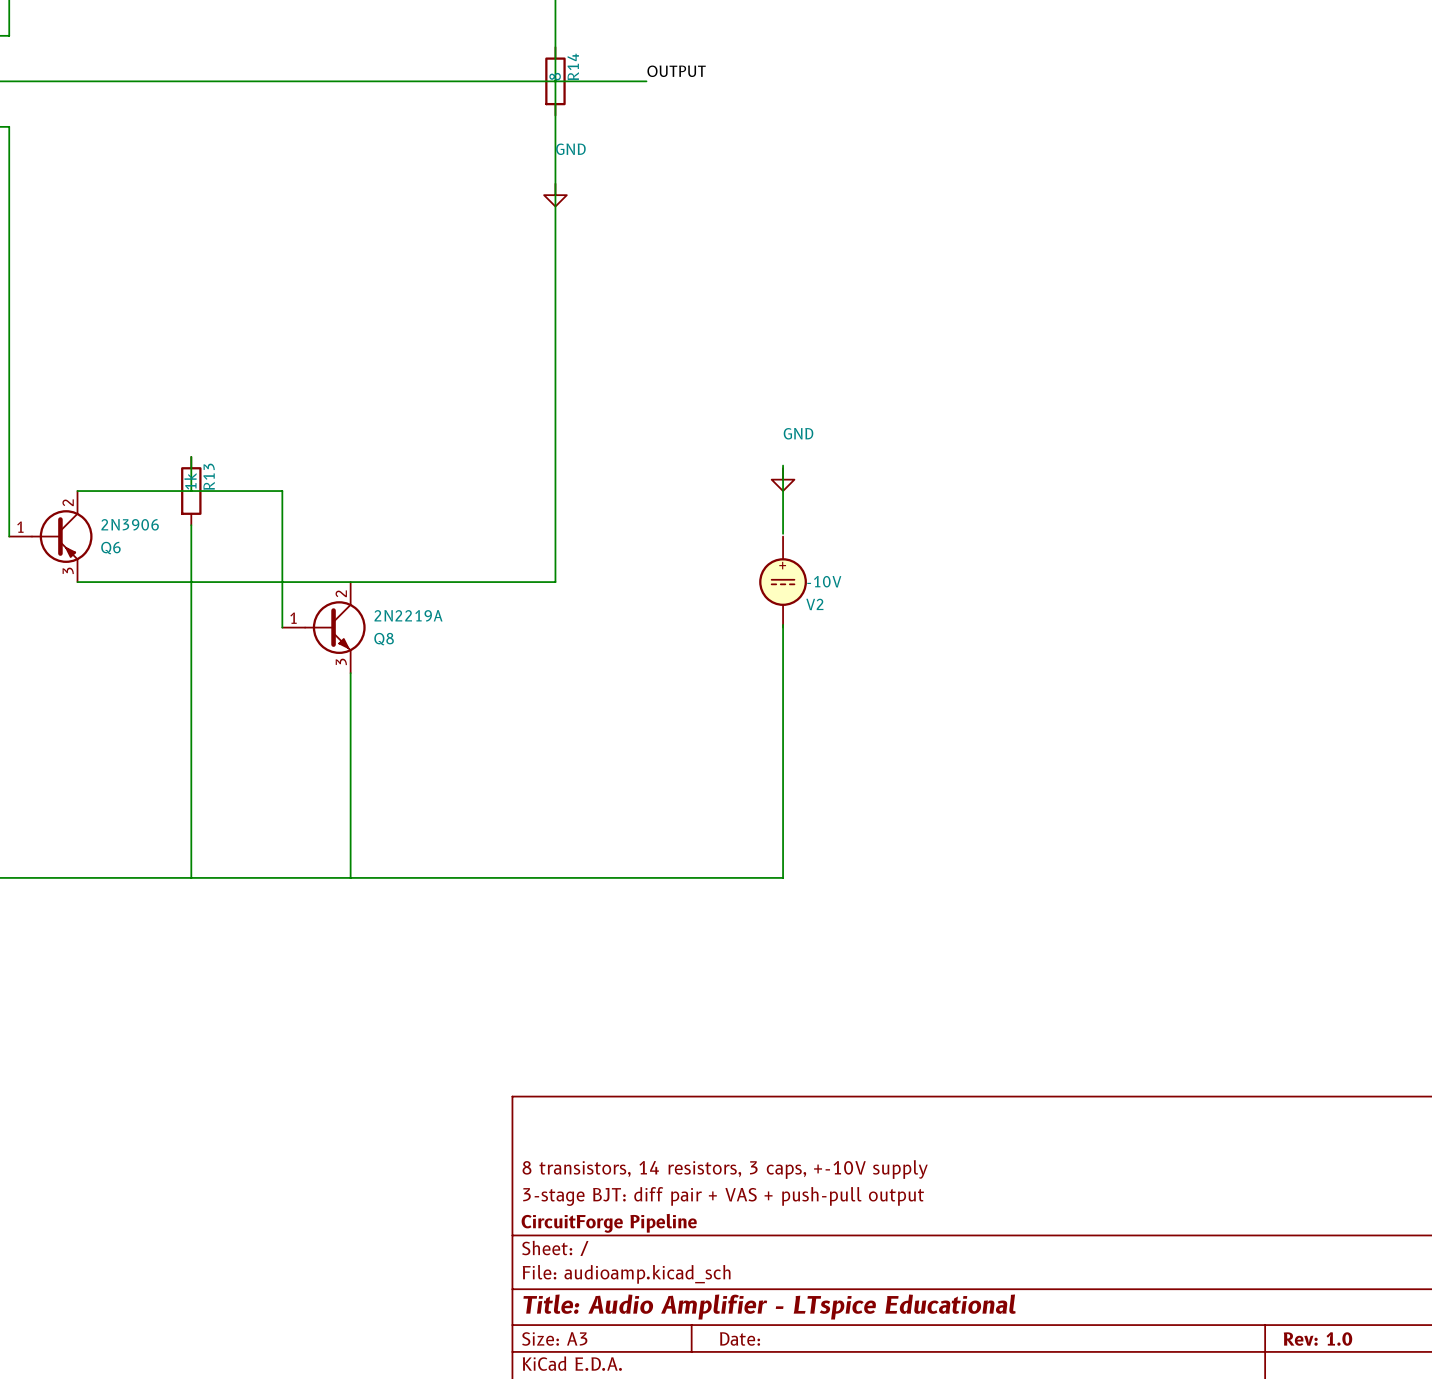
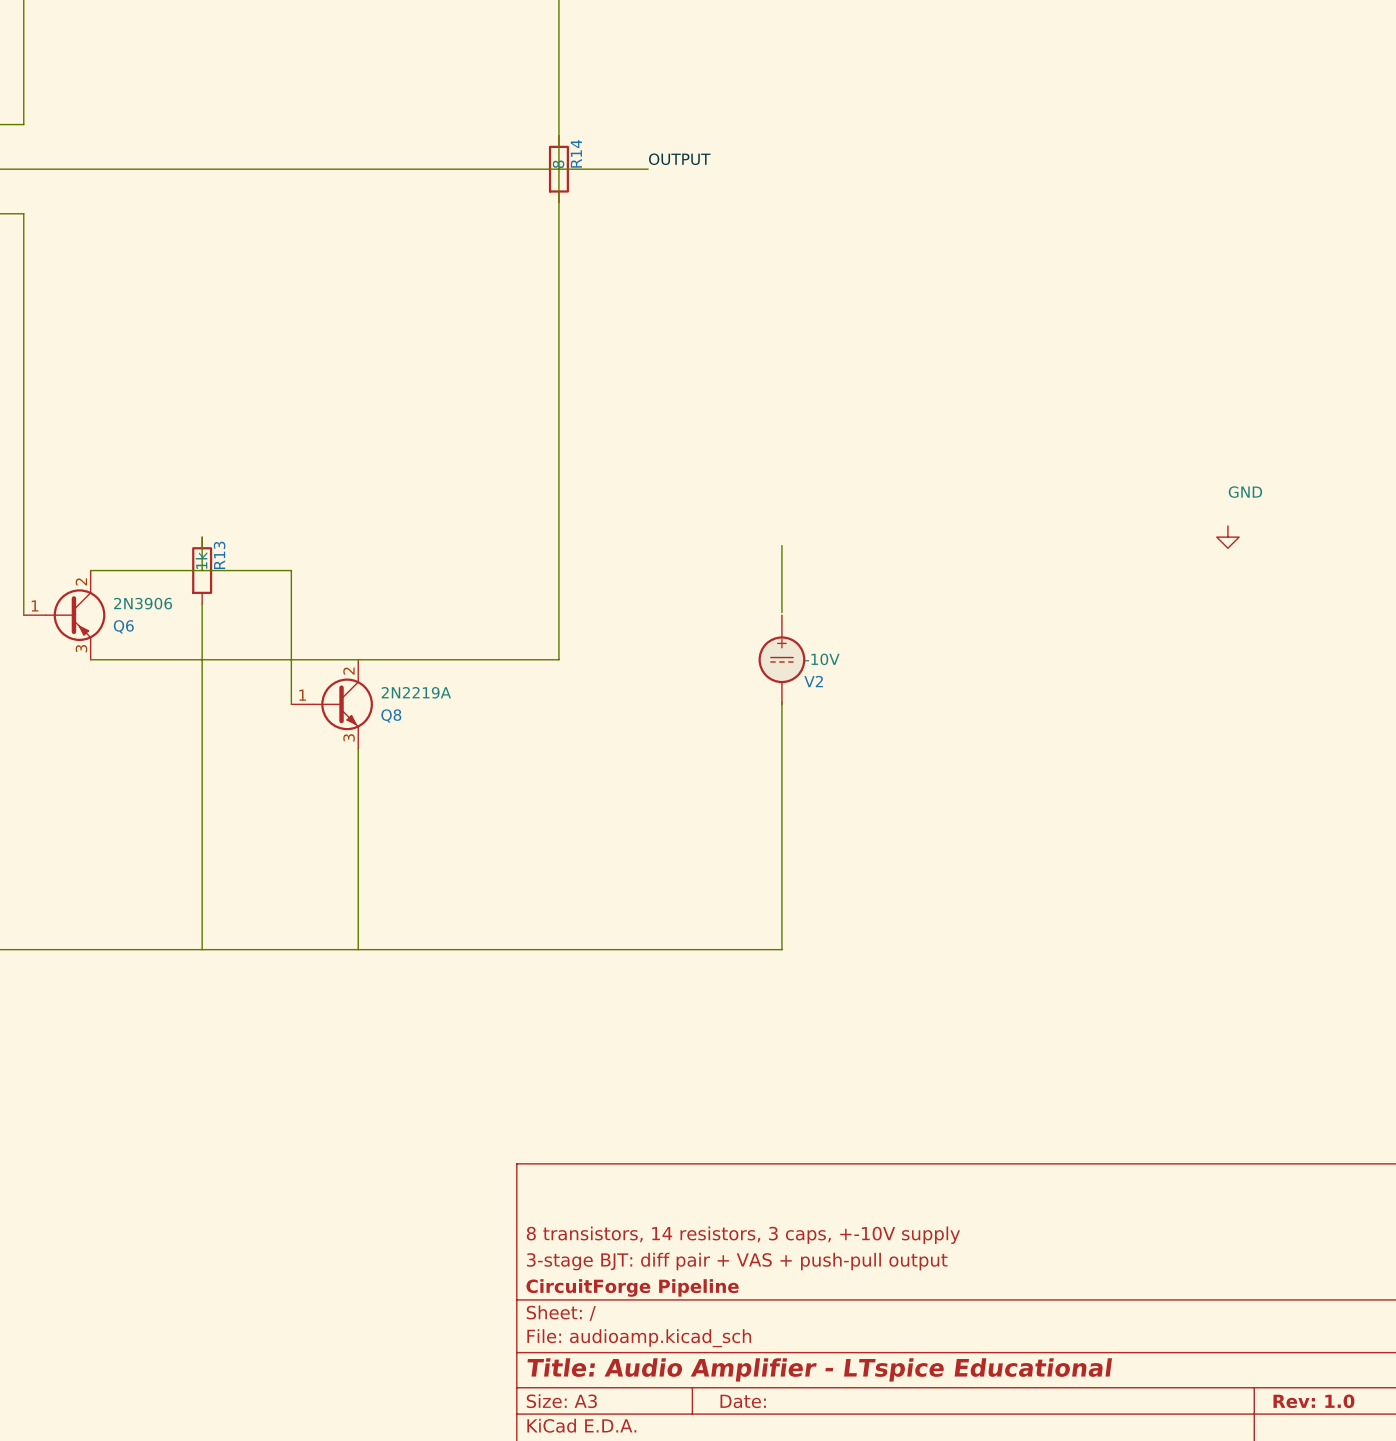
power symbol: GND (555, 195) -> none
power symbol: none -> GND (1227, 537)
power symbol: GND (783, 479) -> none

